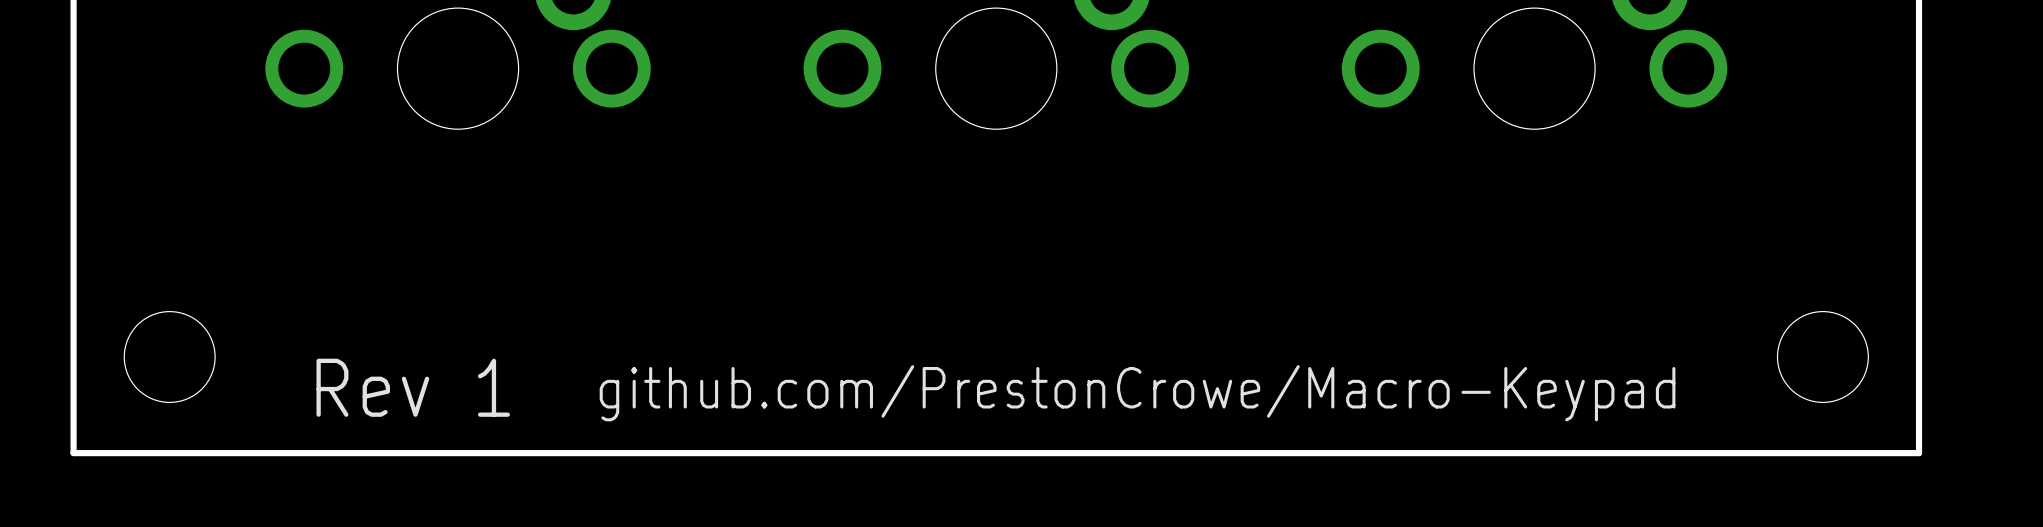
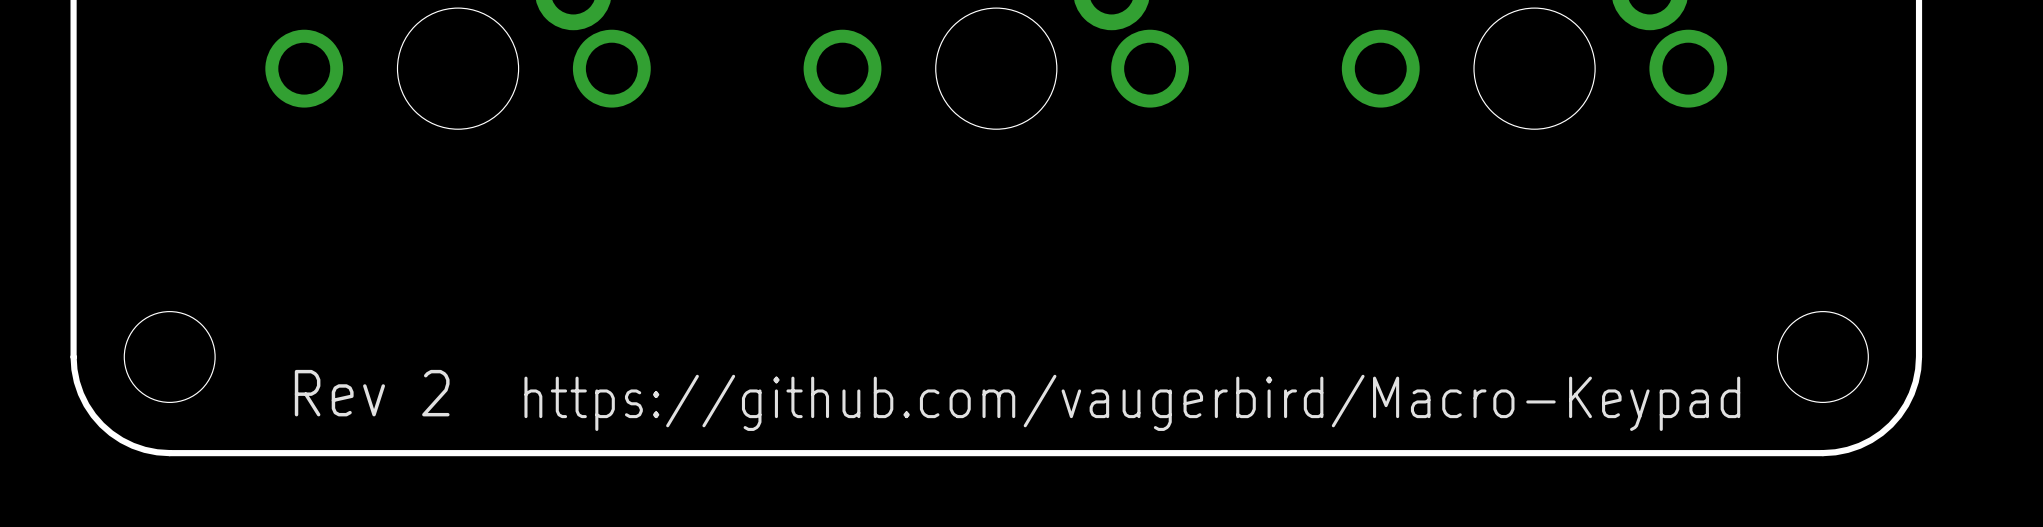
board edge: (73, 357) (73, 453) (169, 453) -> (73, 357) (76, 381) (80, 393) (86, 405) (101, 424) (121, 440) (132, 445) (144, 449) (169, 453)
board edge: (1919, 357) (1919, 453) (1822, 453) -> (1919, 357) (1915, 381) (1911, 393) (1906, 405) (1890, 424) (1870, 440) (1859, 445) (1847, 449) (1822, 453)
text: Rev 1 (413, 387) -> Rev 2 (372, 393)
text: github.com/PrestonCrowe/Macro-Keypad (1137, 393) -> https://github.com/vaugerbird/Macro-Keypad (1132, 402)

